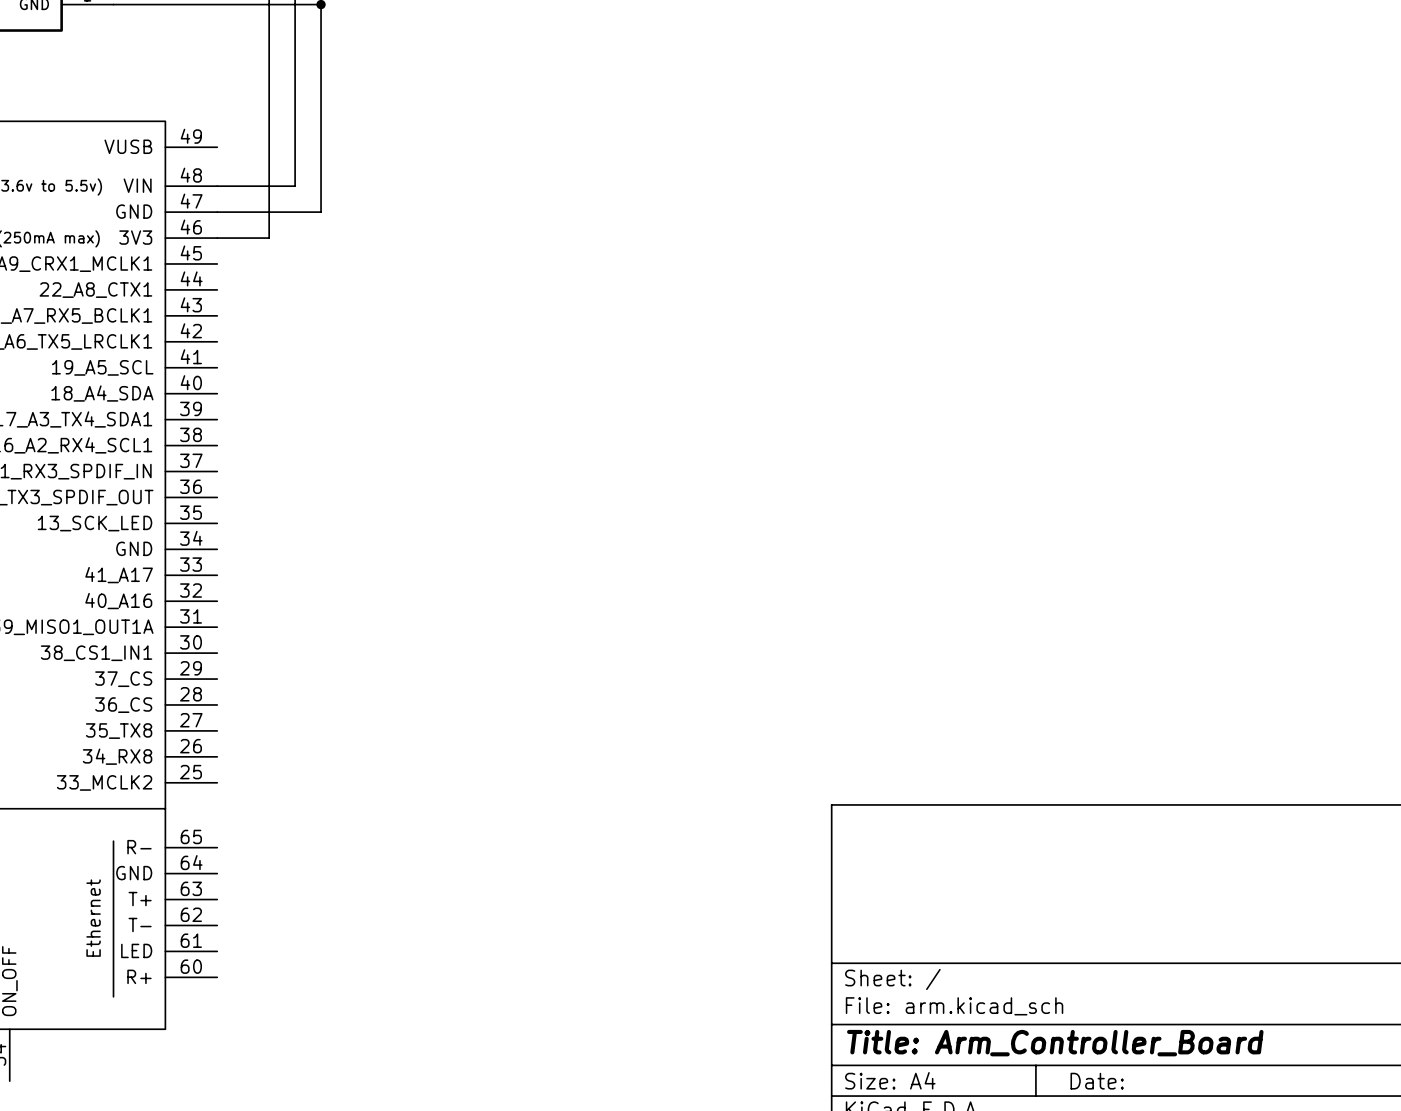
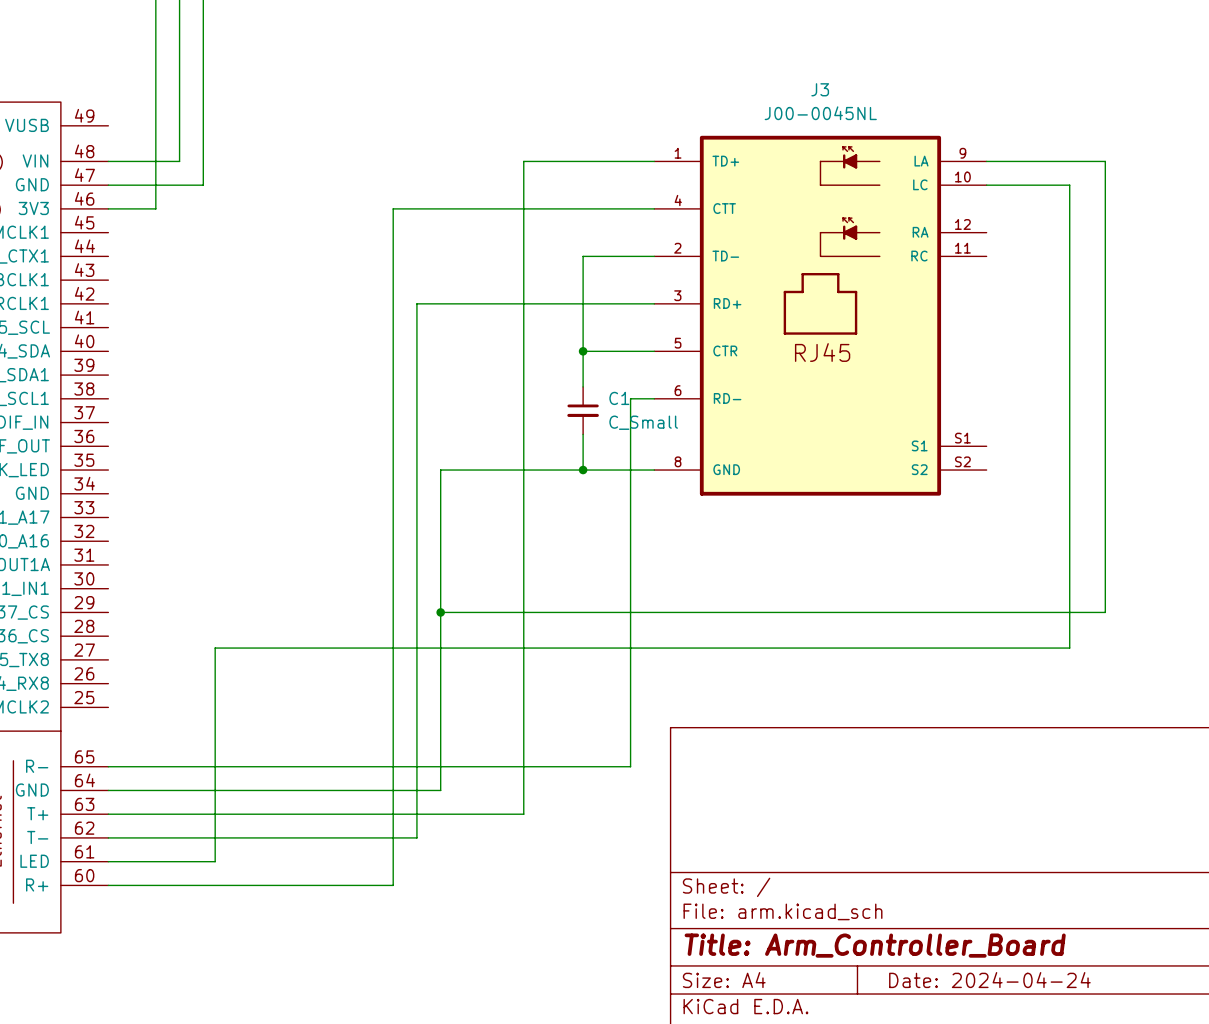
wire: none -> (654, 161) (523, 161) (523, 814) (108, 814)
wire: none -> (986, 161) (1105, 161) (1105, 612) (440, 612)
wire: none -> (986, 185) (1069, 185) (1069, 648) (215, 648) (215, 861) (108, 861)
wire: none -> (654, 208) (393, 208) (393, 885) (108, 885)
wire: none -> (654, 256) (583, 256) (583, 386)
wire: none -> (654, 303) (416, 303) (416, 837) (108, 837)
J3: none -> J00-0045NL (820, 315)
wire: none -> (583, 351) (654, 351)
junction: none -> (583, 351)
wire: none -> (654, 398) (630, 398) (630, 766) (108, 766)
C1: none -> C_Small (583, 410)
wire: none -> (583, 434) (583, 470)
junction: none -> (583, 470)
wire: none -> (654, 470) (440, 470) (440, 790) (108, 790)
junction: none -> (440, 612)
title block: Date: (1097, 1081) -> Date: 2024-04-24 (989, 980)

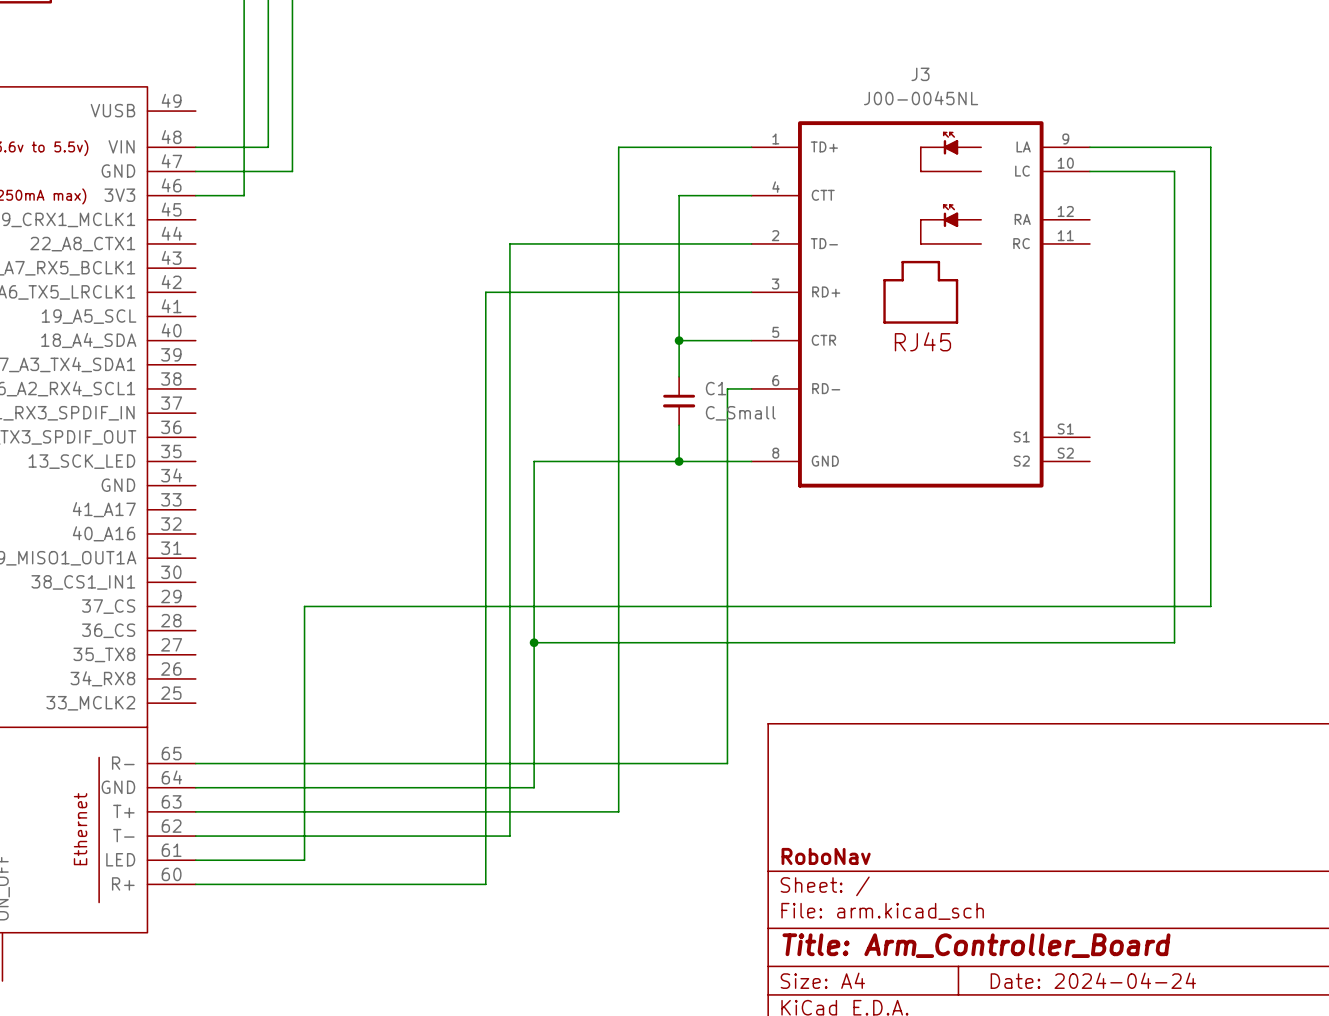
wire: (583, 208) (393, 208) (393, 303) -> (679, 195) (679, 243) (509, 243) (509, 292) (485, 292)
junction position: (440, 612) -> (534, 642)
wire: (215, 648) (440, 648) -> (304, 642) (304, 606) (534, 606)
title block: none -> RoboNav (826, 856)

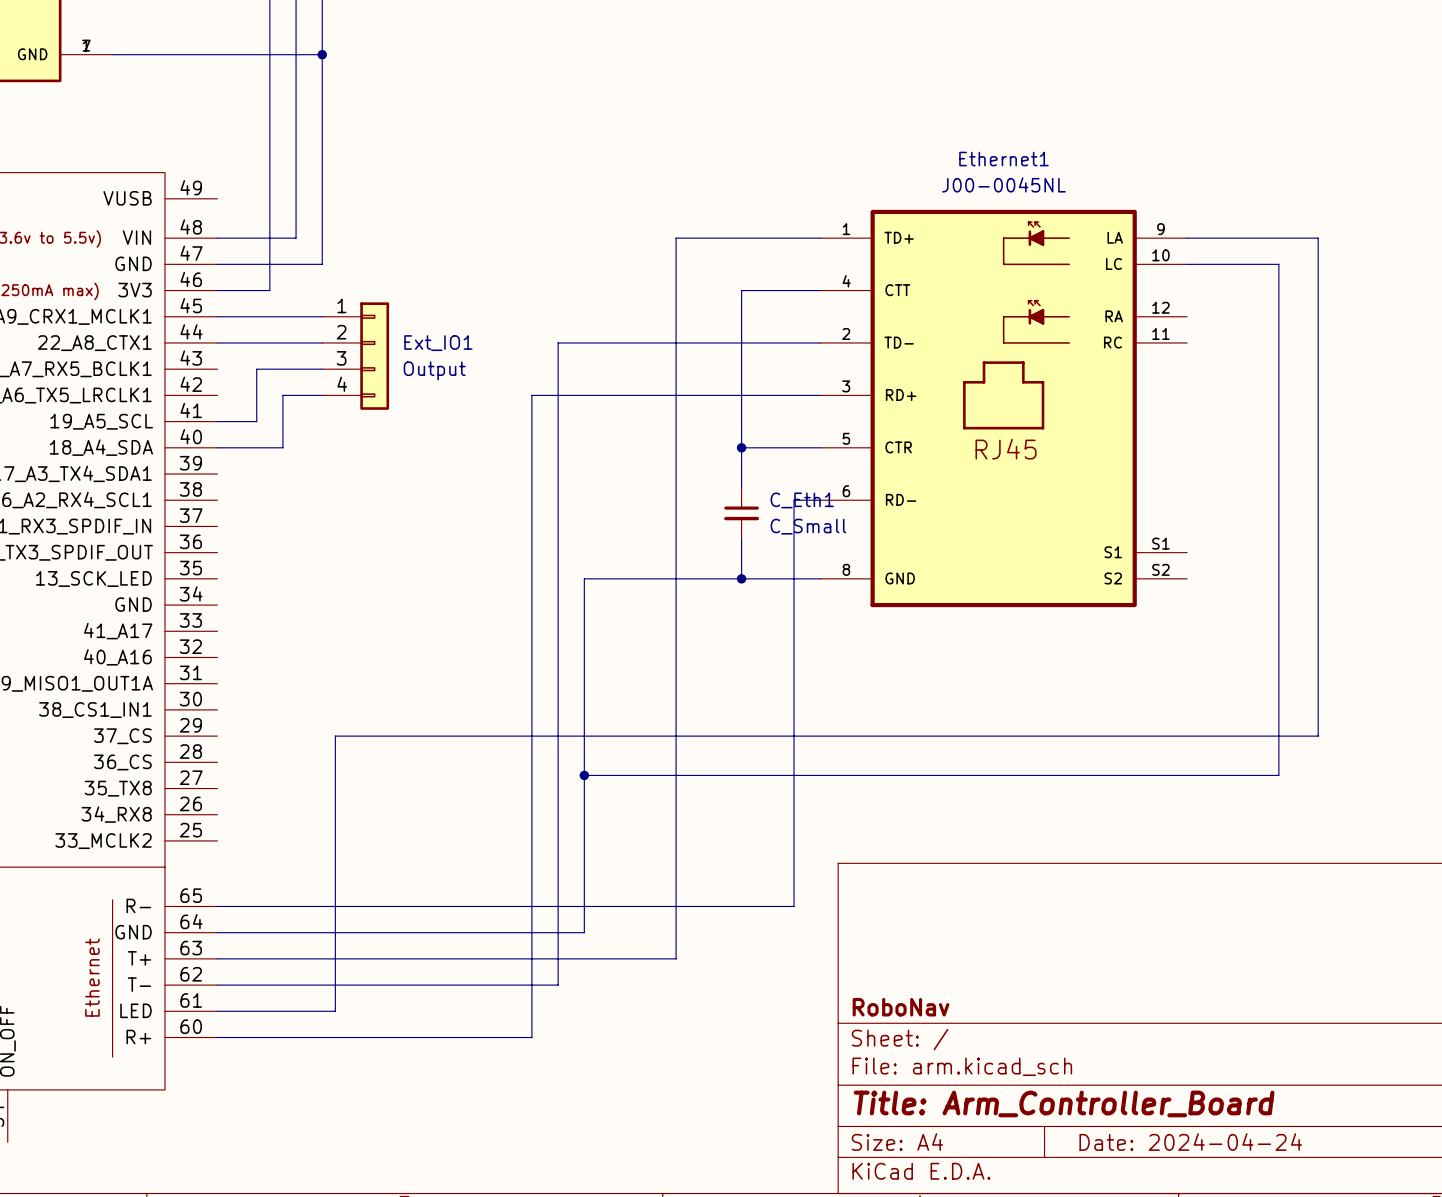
J3 name: J3 (920, 74) -> Ethernet1 (1003, 159)
wire: none -> (217, 316) (322, 316)
wire: none -> (217, 342) (322, 342)
Ext_IO1: none -> Output (355, 356)
wire: none -> (322, 369) (256, 369) (256, 421) (217, 421)
wire: none -> (322, 395) (282, 395) (282, 447) (217, 447)
C1 name: C1 (716, 388) -> C_Eth1 (802, 500)

